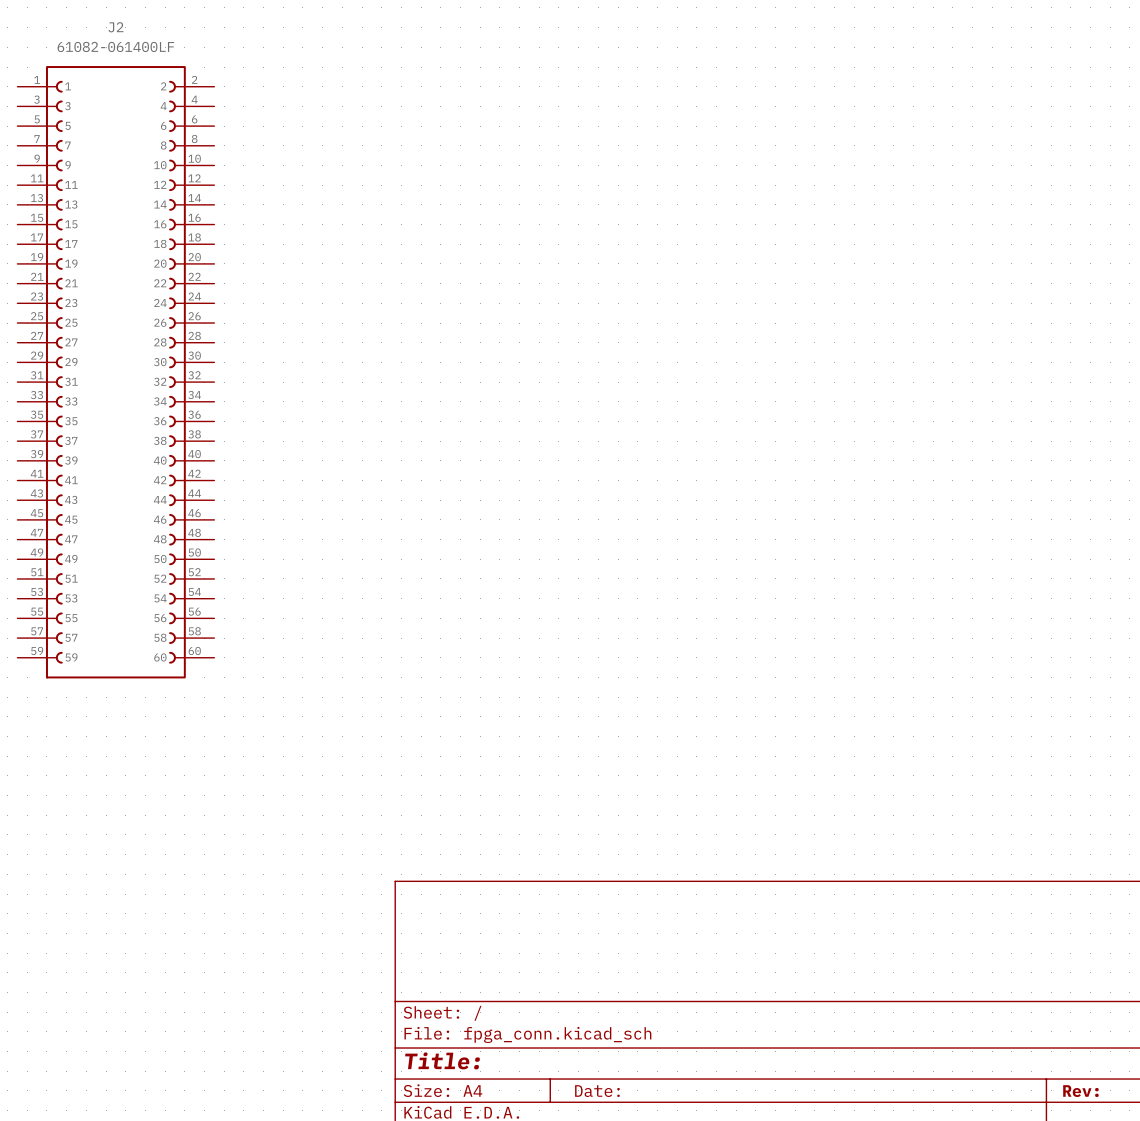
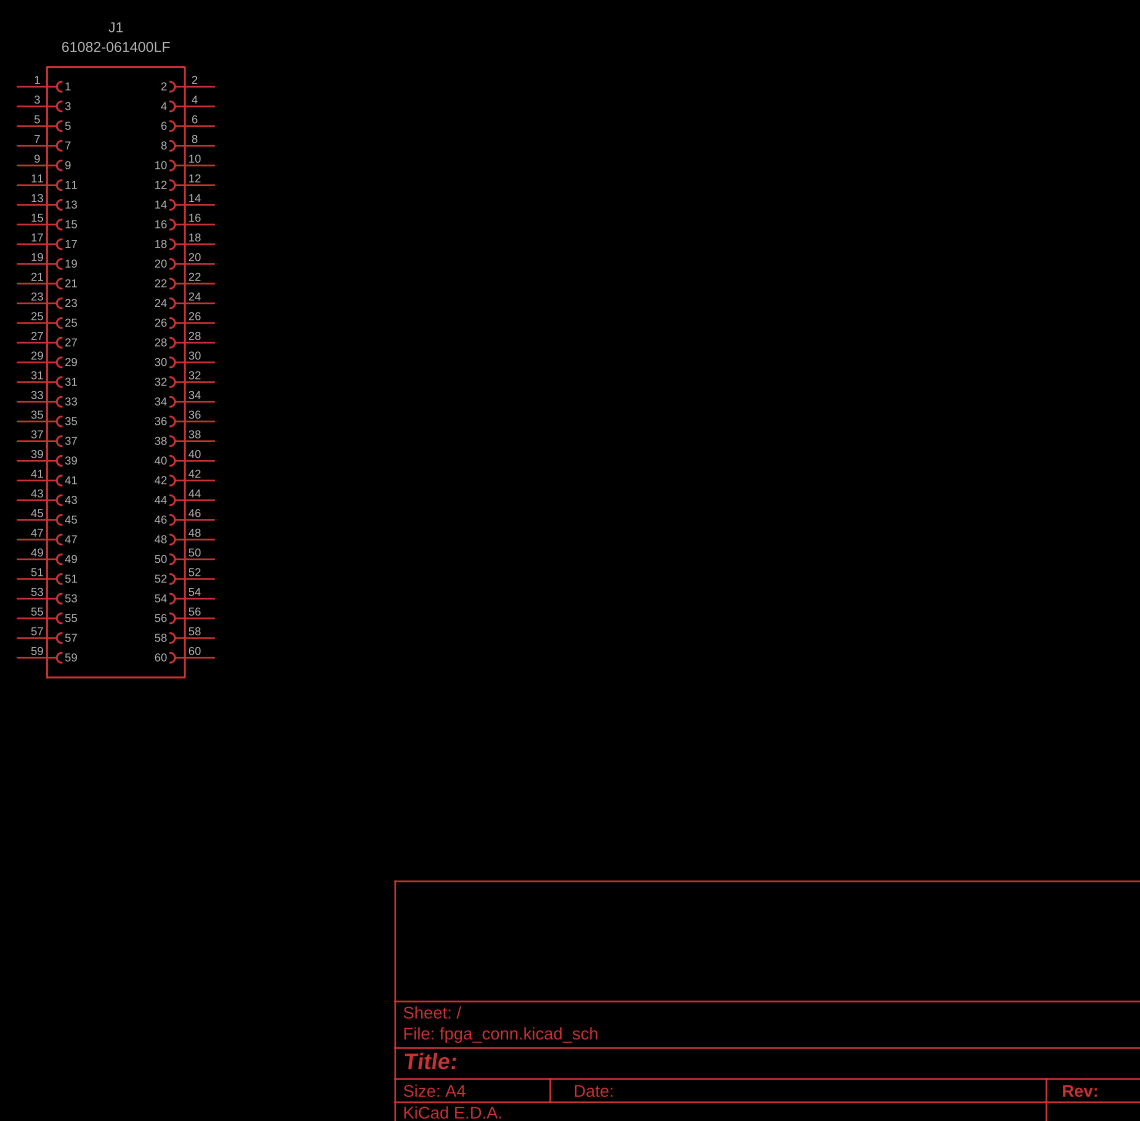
J2 name: J2 (115, 27) -> J1 (115, 27)

